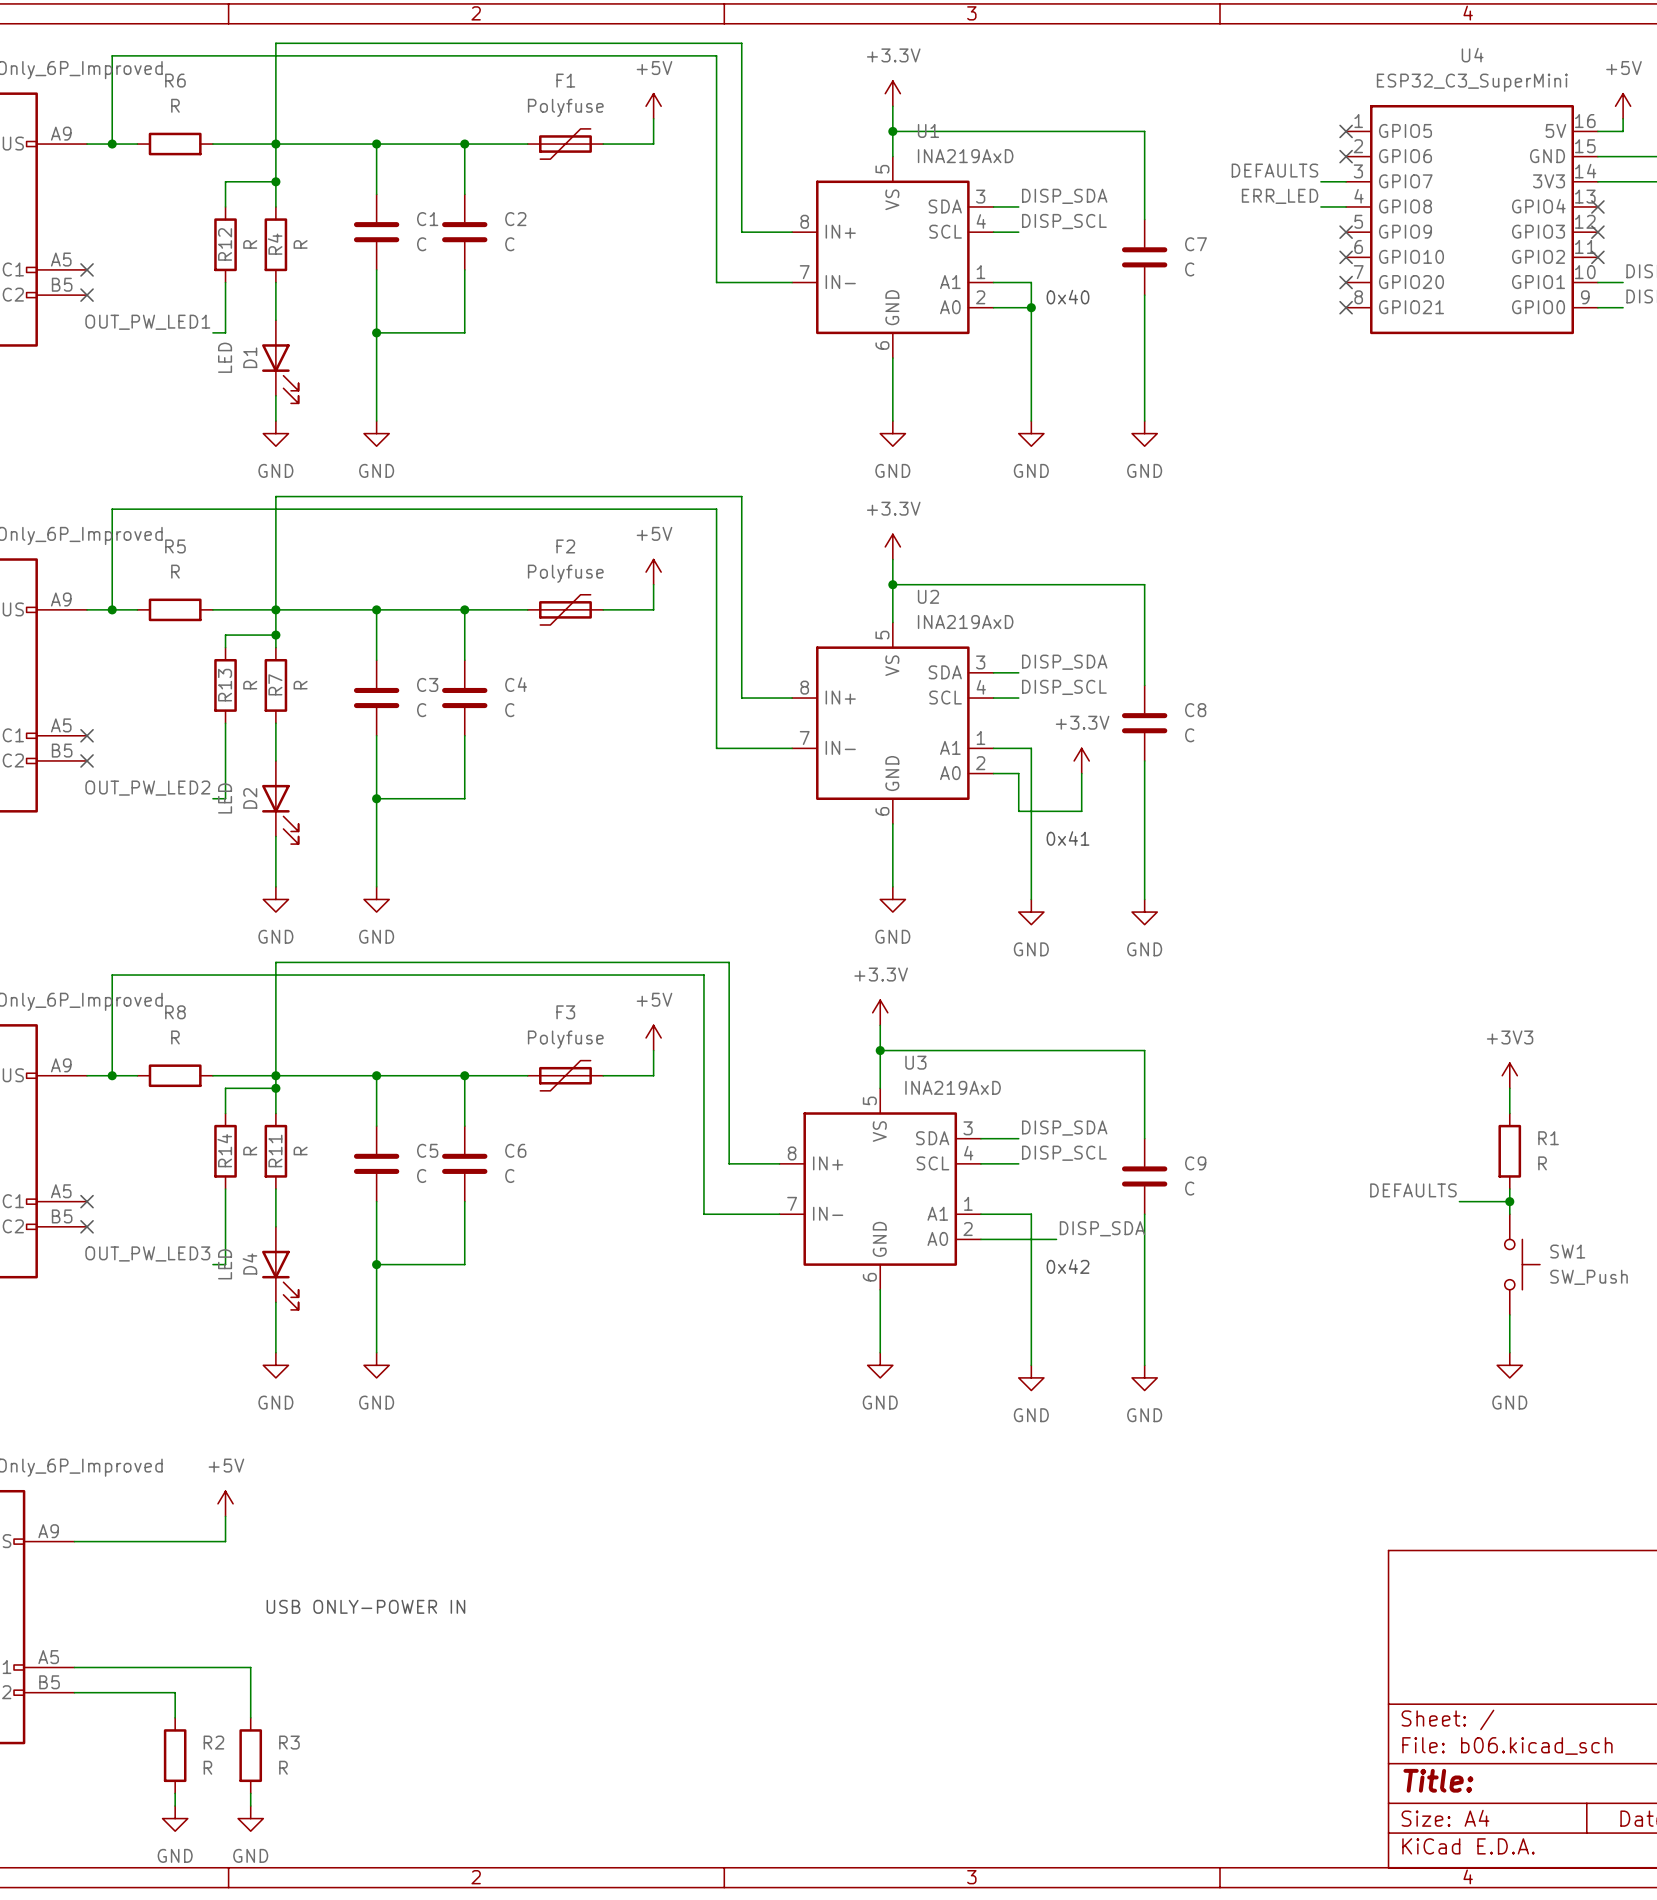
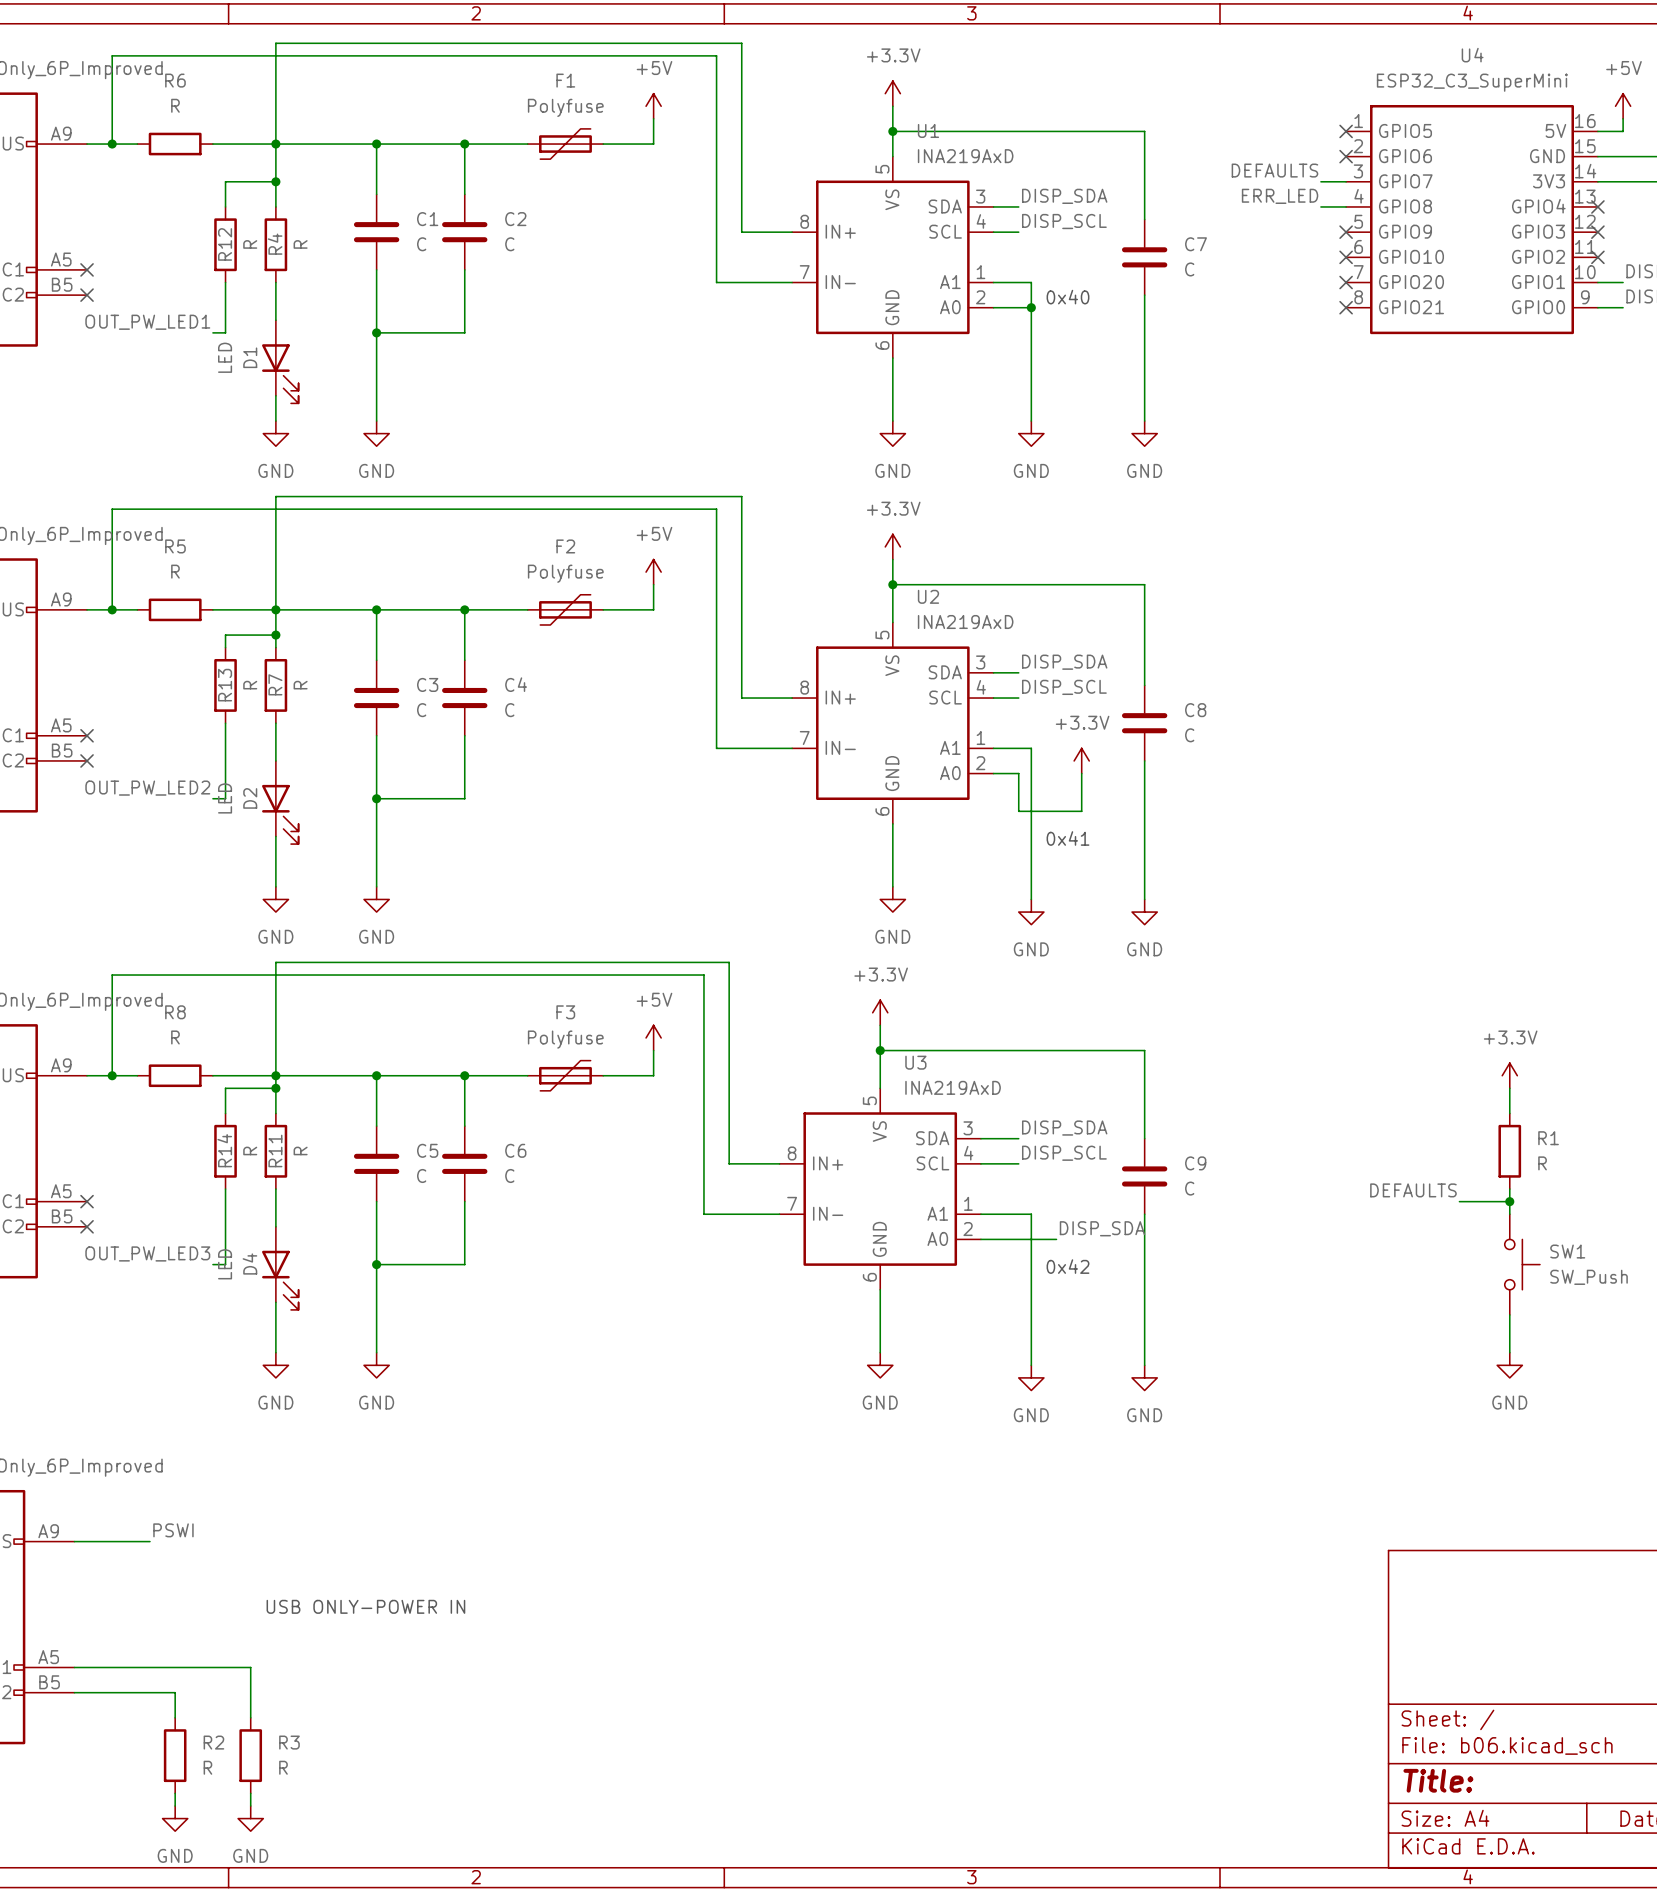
power symbol: +3V3 (1509, 1075) -> +3.3V (1509, 1075)
power symbol: +5V (225, 1503) -> none
wire: (225, 1516) (225, 1541) (149, 1541) -> none
label: none -> PSWI (173, 1530)

